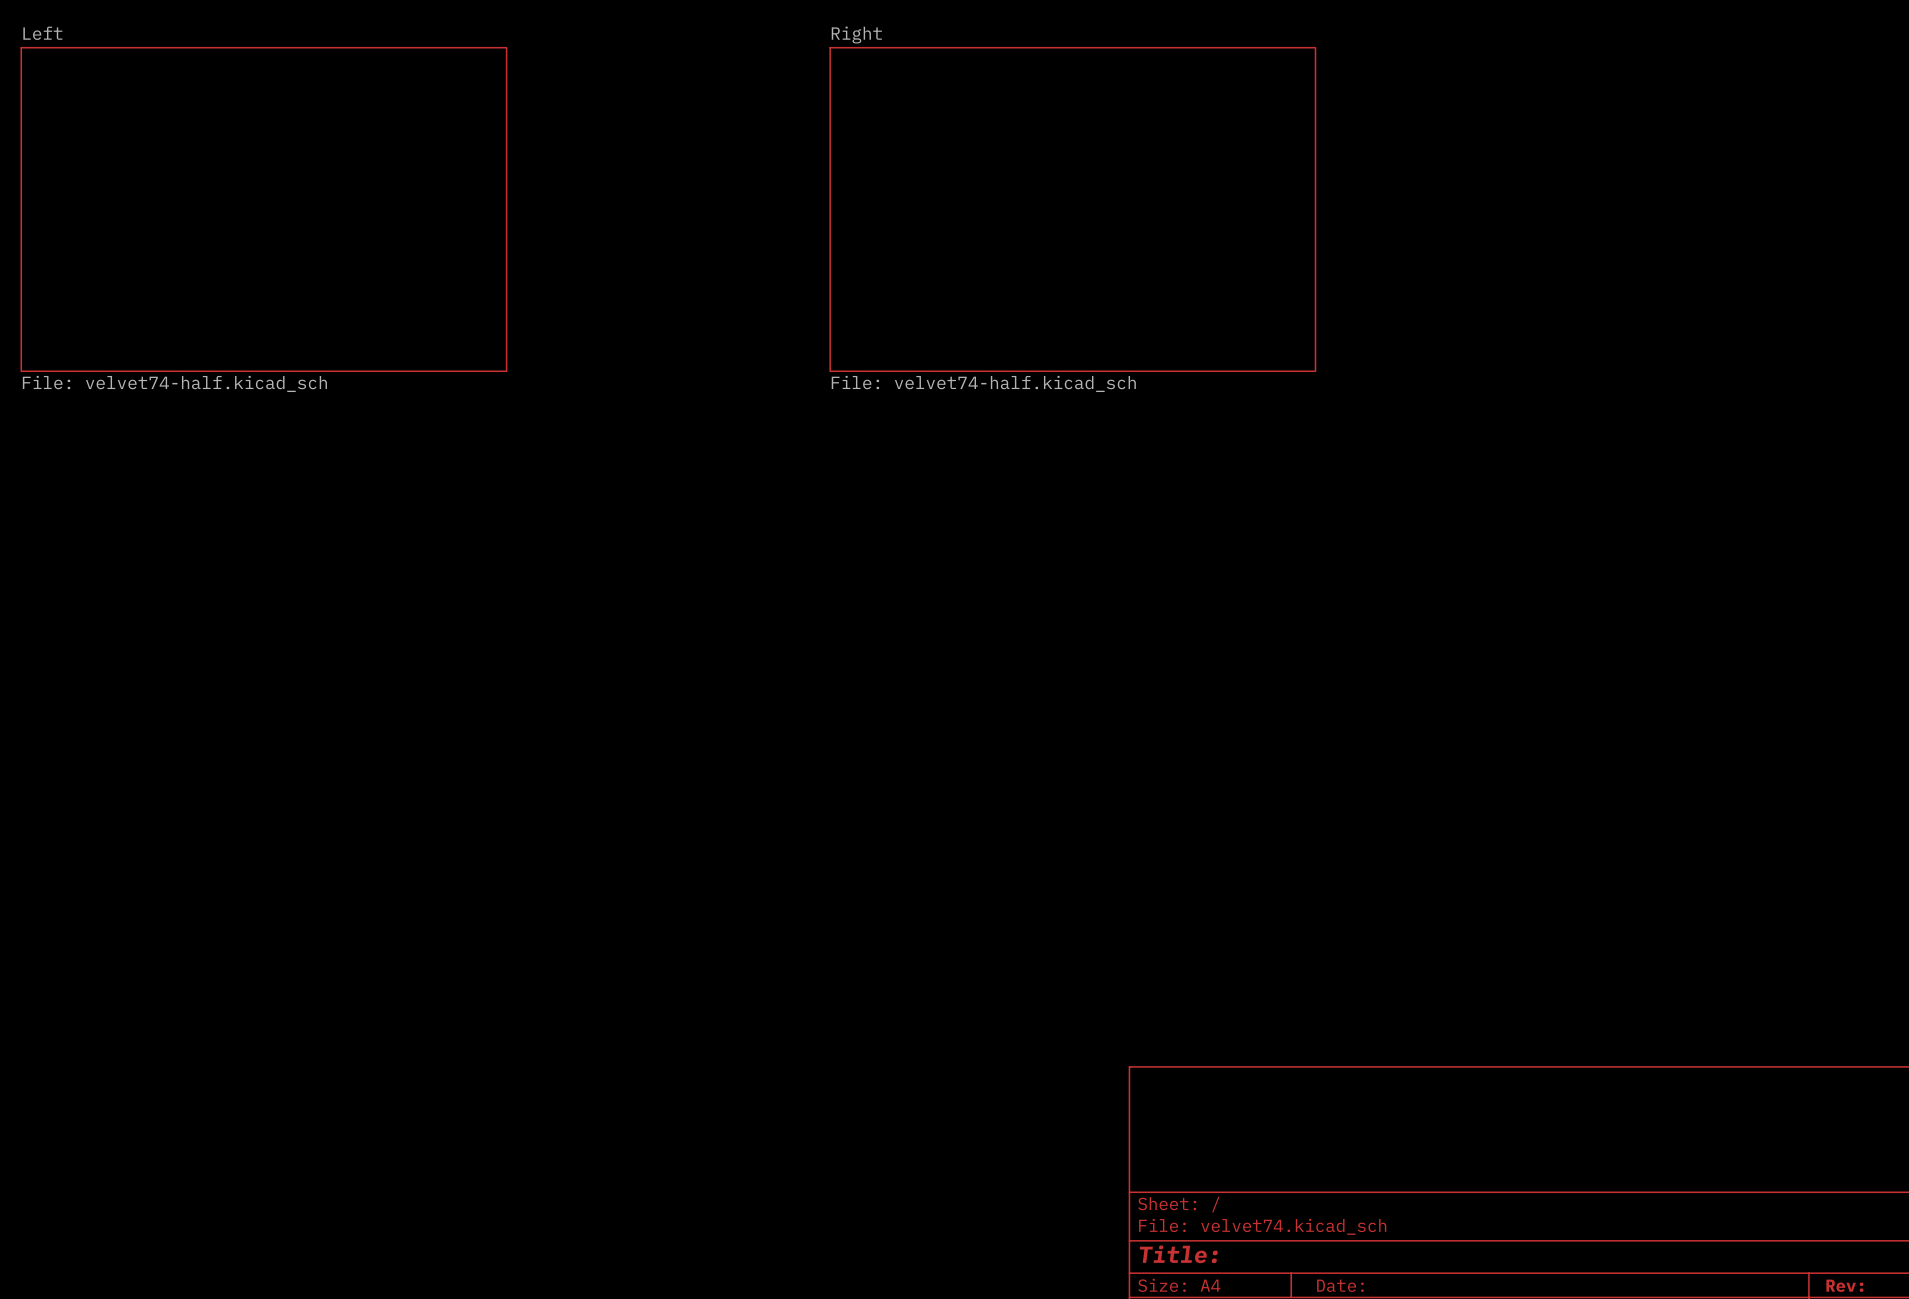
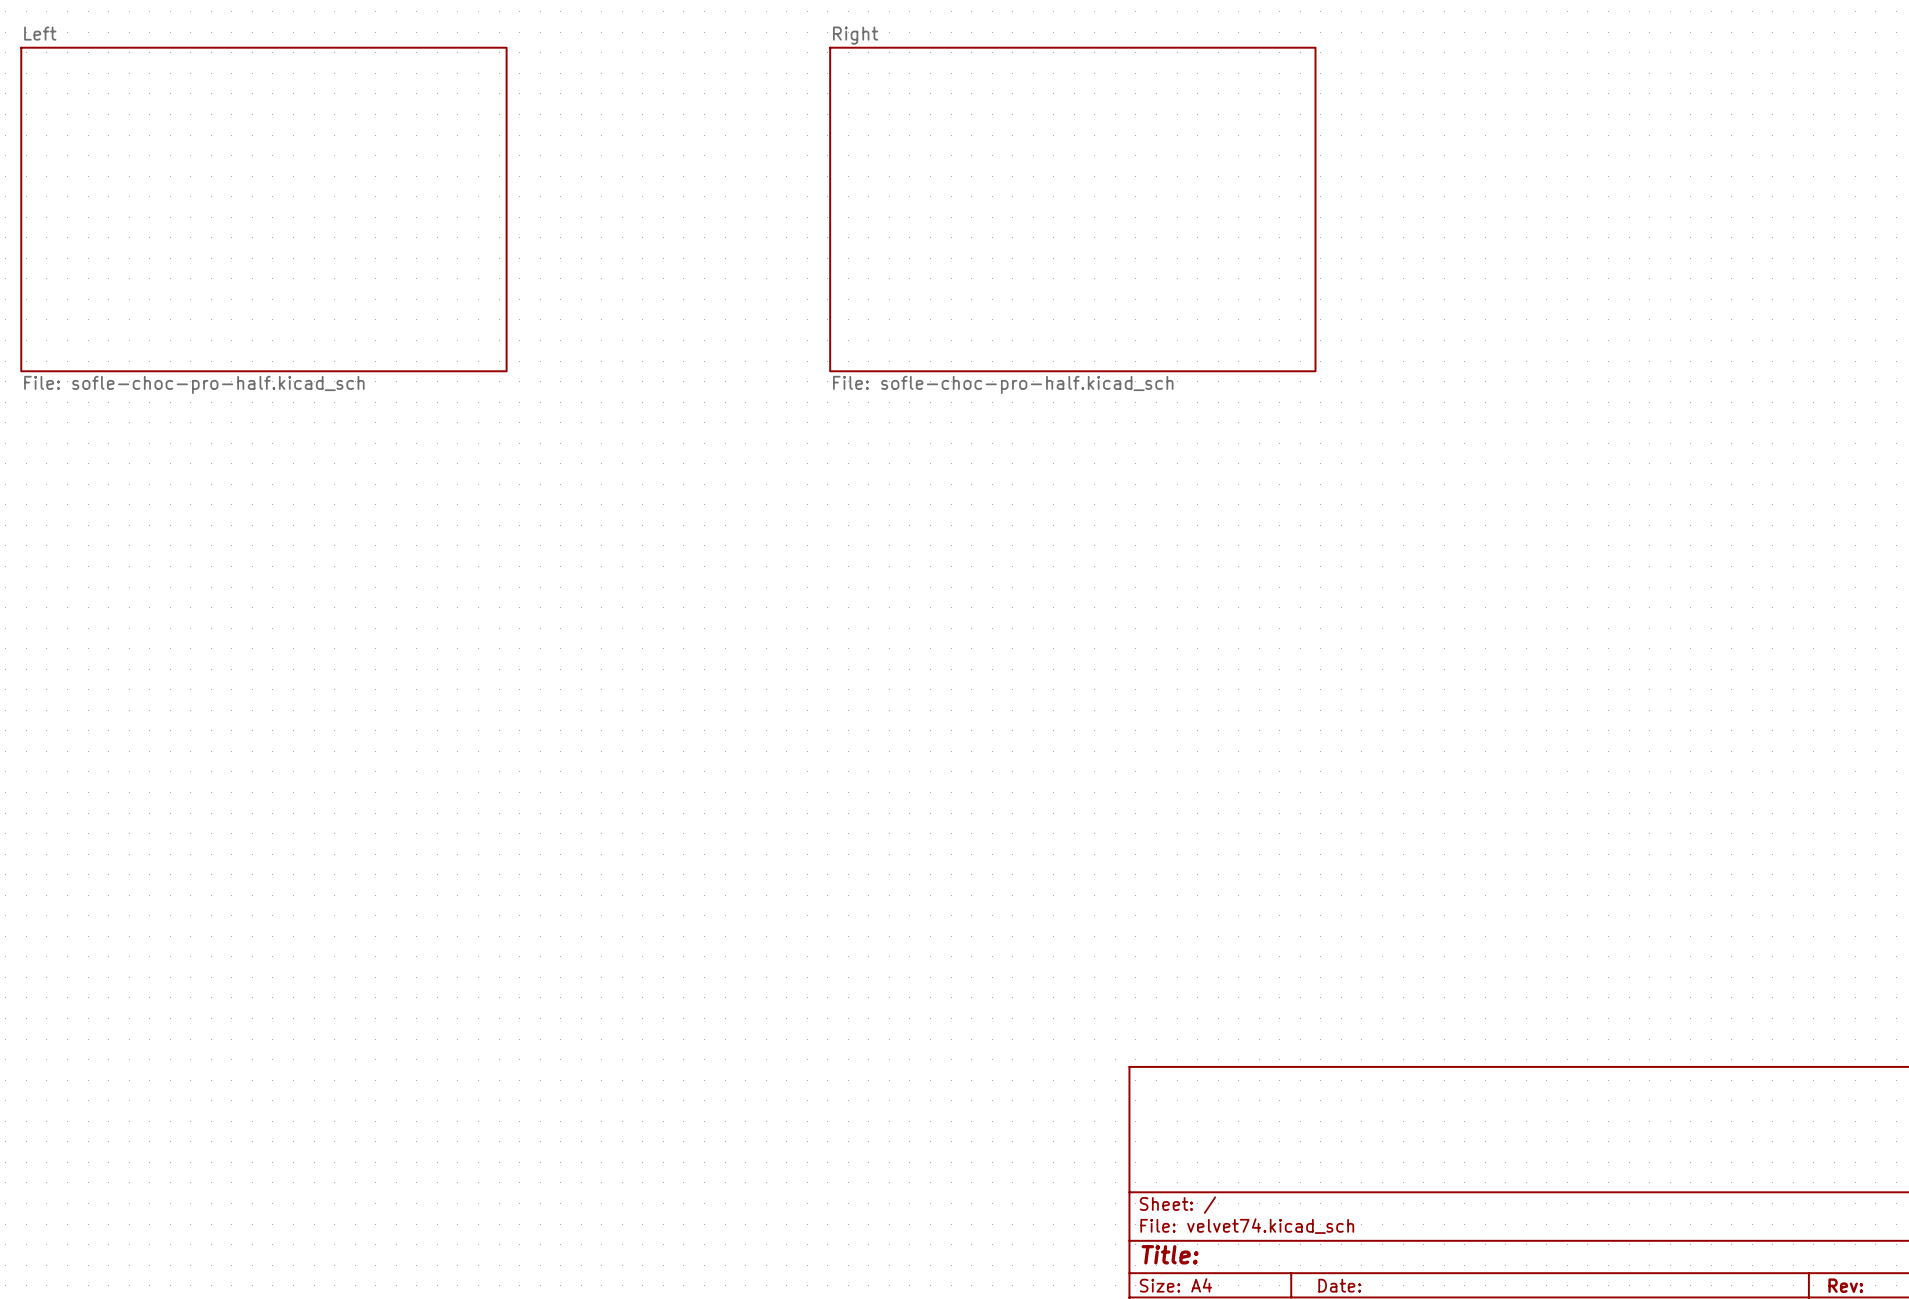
sheet Left value: File: velvet74-half.kicad_sch (174, 383) -> File: sofle-choc-pro-half.kicad_sch (194, 384)
sheet Right value: File: velvet74-half.kicad_sch (983, 383) -> File: sofle-choc-pro-half.kicad_sch (1003, 384)

